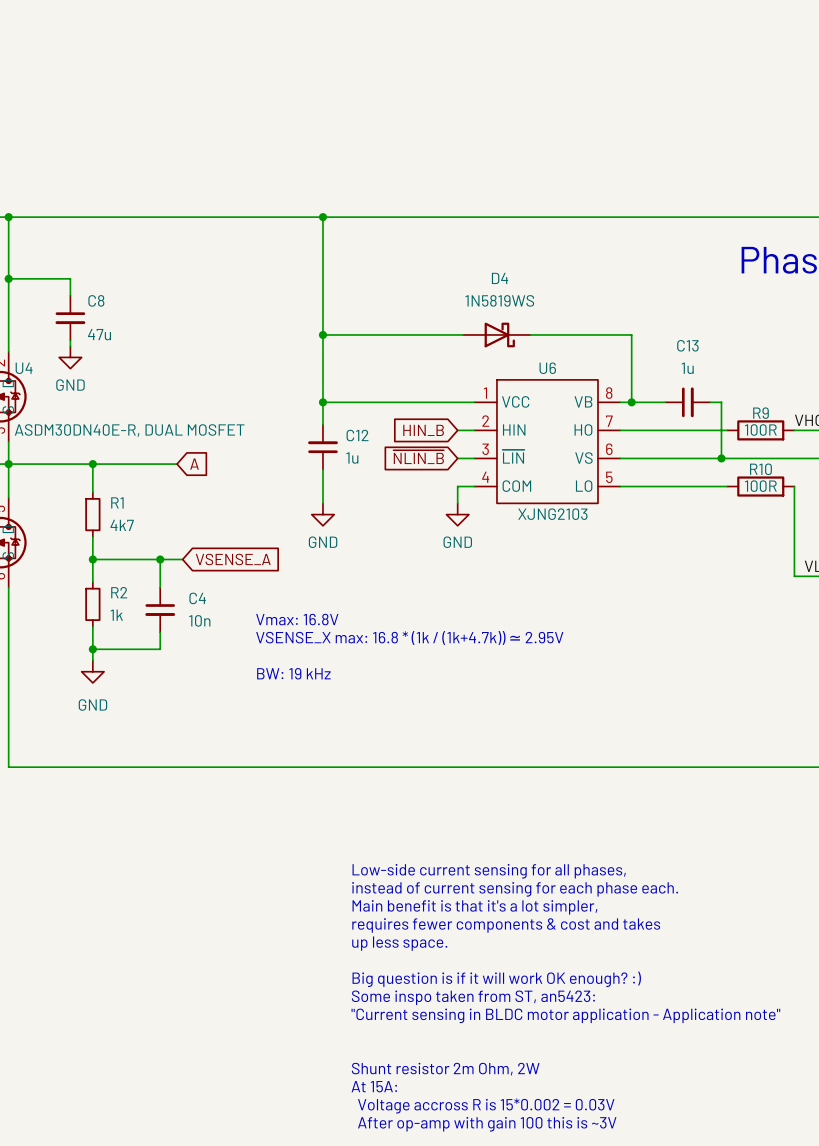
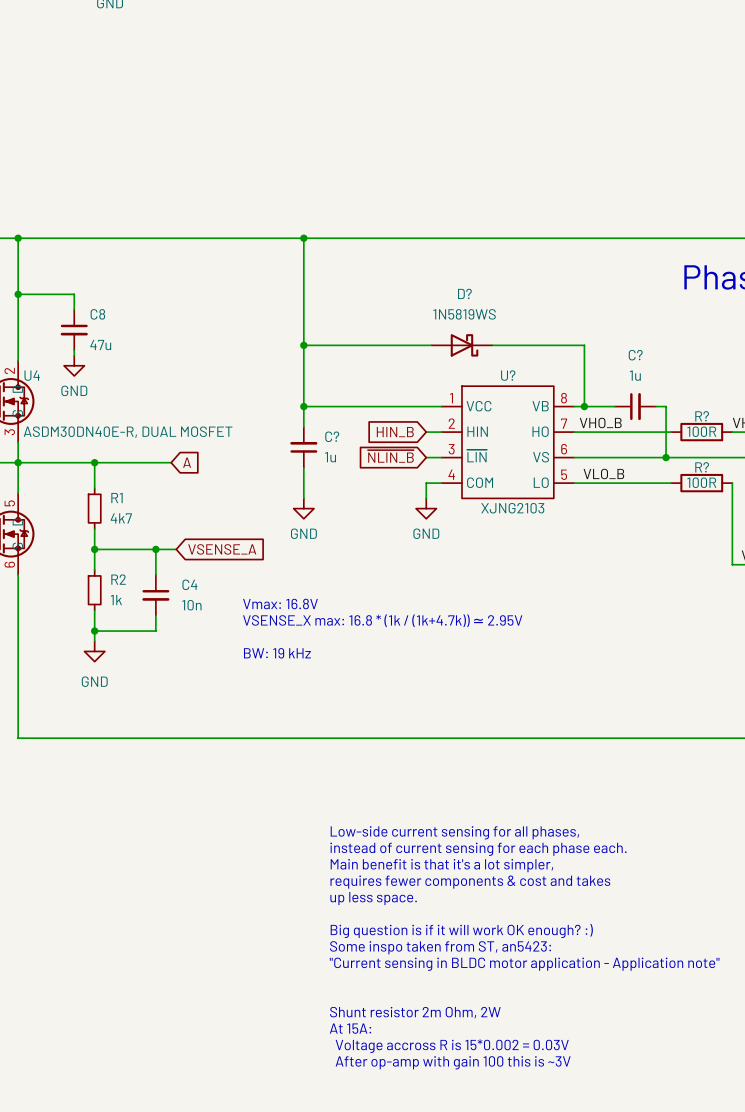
D4 name: D4 (500, 278) -> D? (464, 293)
C13 name: C13 (687, 345) -> C? (635, 355)
U6 name: U6 (547, 368) -> U? (508, 375)
R9 name: R9 (761, 413) -> R? (702, 416)
label: none -> VHO_B (600, 422)
C12 name: C12 (357, 435) -> C? (332, 436)
R10 name: R10 (760, 469) -> R? (702, 467)
label: none -> VLO_B (603, 473)

